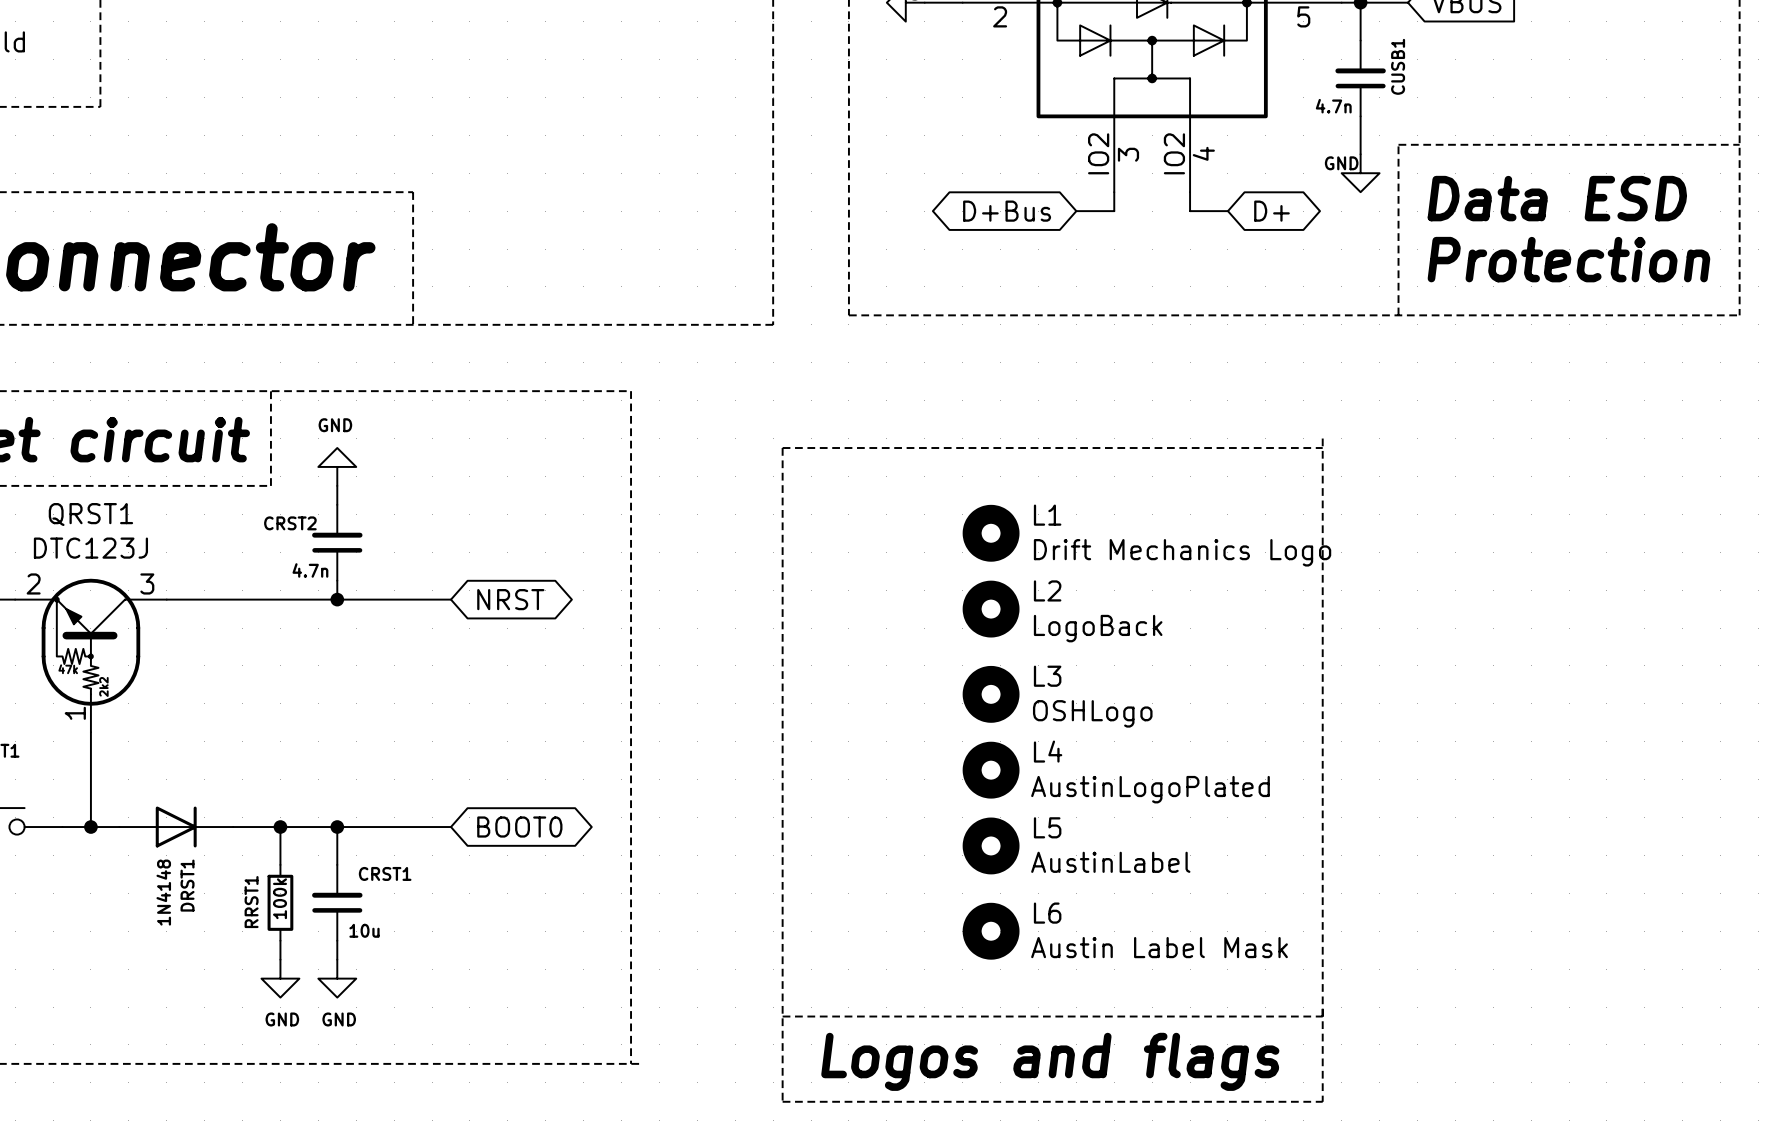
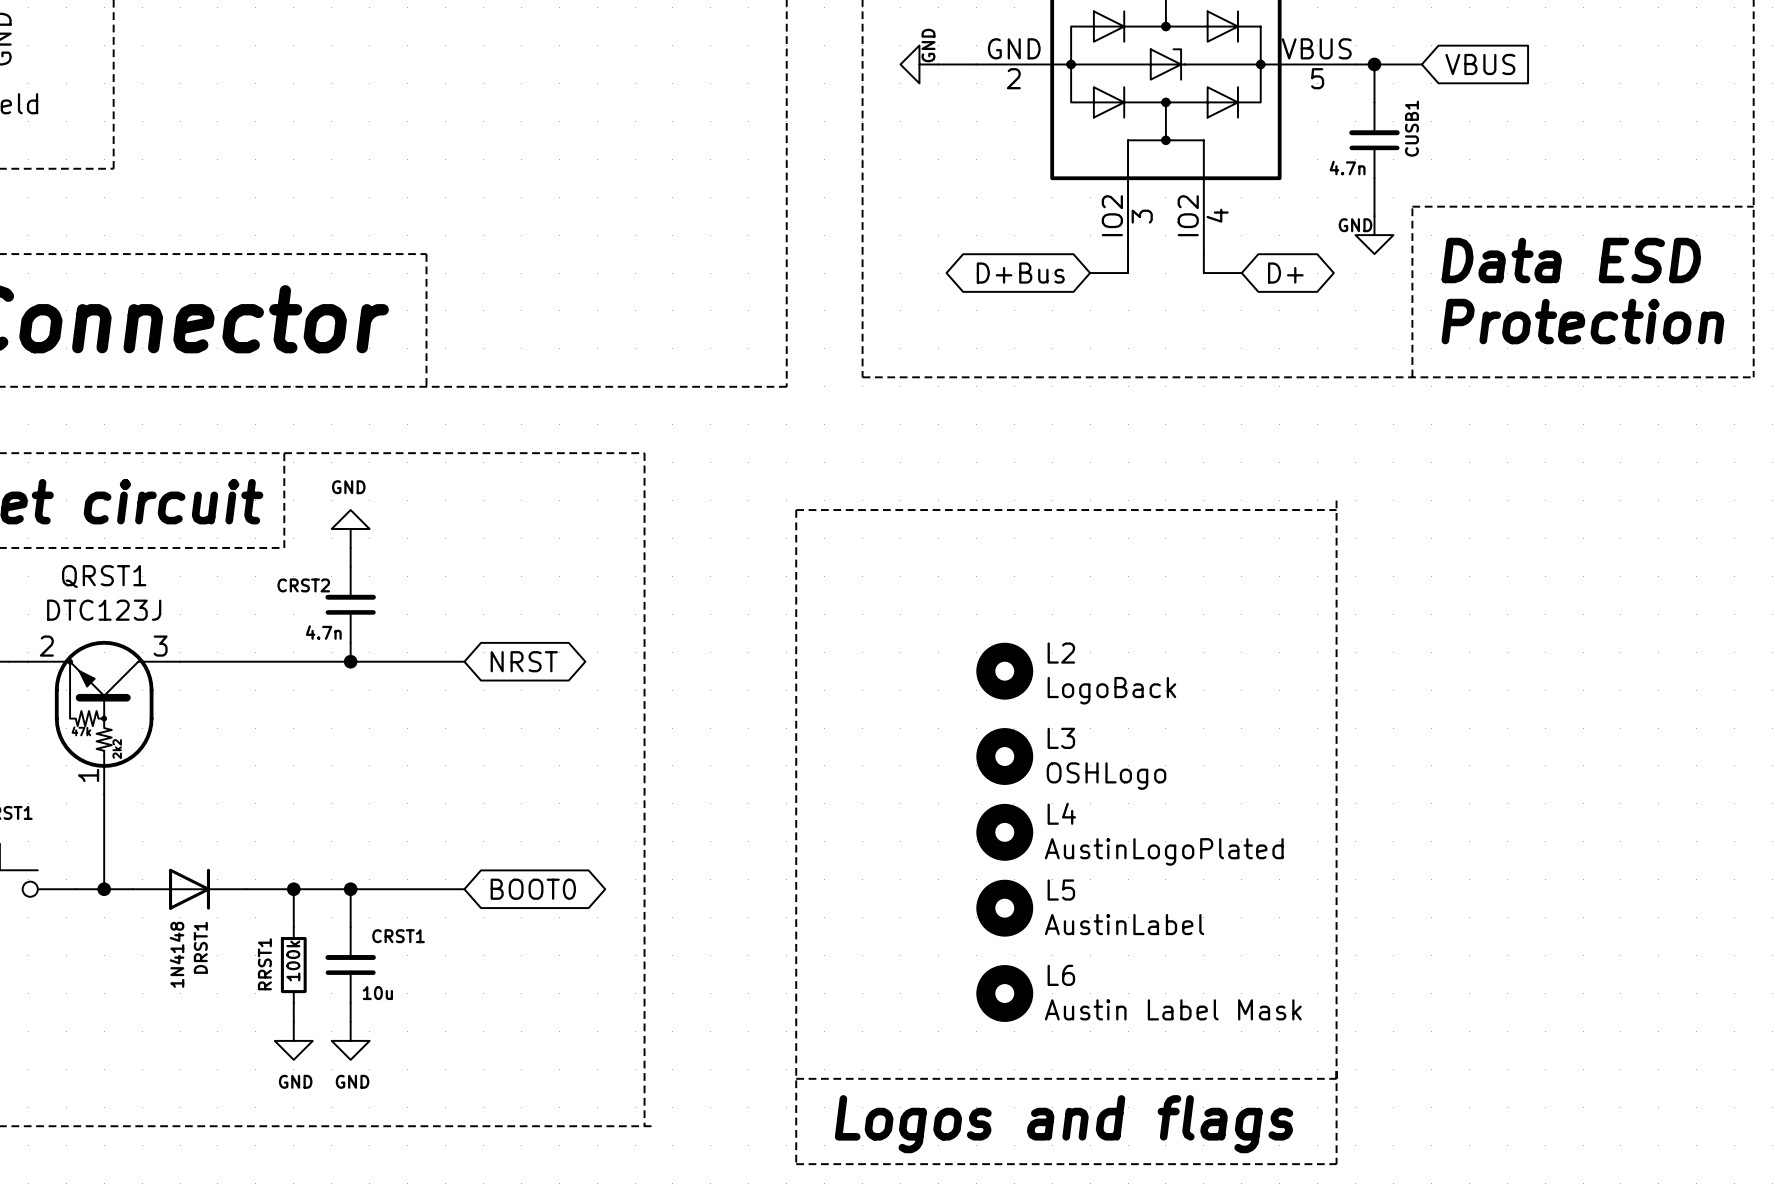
L1: Drift Mechanics Logo (991, 533) -> none

